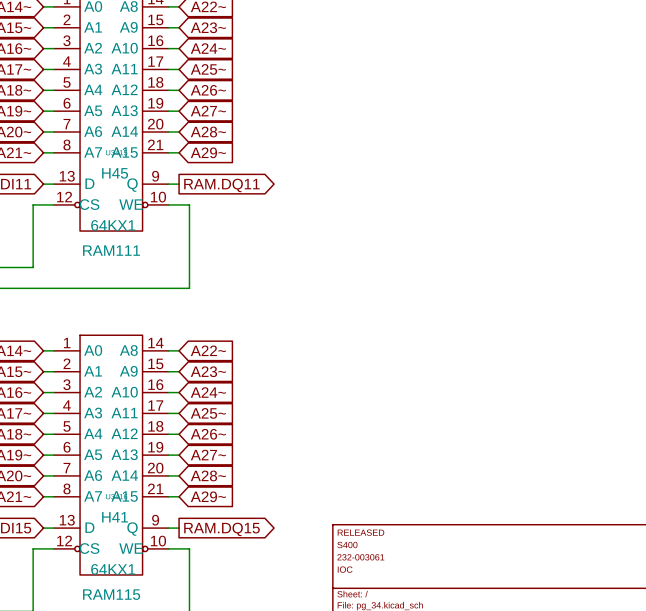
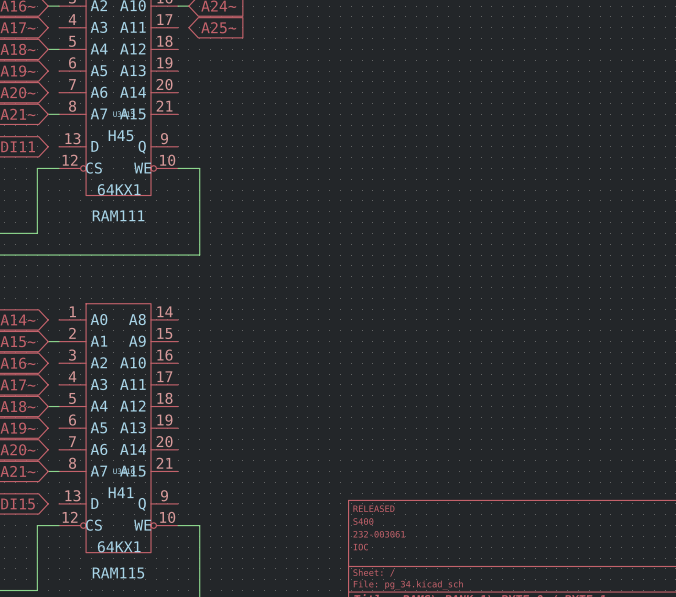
wire: (43, 69) (53, 69) -> none
wire: (168, 69) (179, 69) -> none
wire: (168, 90) (179, 90) -> none
global label: A26~ (208, 90) -> none
wire: (43, 111) (53, 111) -> none
wire: (168, 111) (179, 111) -> none
global label: A27~ (208, 111) -> none
wire: (43, 132) (53, 132) -> none
wire: (168, 132) (179, 132) -> none
global label: A28~ (208, 132) -> none
wire: (168, 152) (179, 152) -> none
global label: A29~ (208, 152) -> none
wire: (43, 184) (53, 184) -> none
wire: (168, 184) (179, 184) -> none
global label: RAM.DQ11 (221, 185) -> none
wire: (43, 350) (53, 350) -> none
wire: (168, 350) (179, 350) -> none
global label: A22~ (208, 350) -> none
wire: (168, 371) (179, 371) -> none
global label: A23~ (208, 371) -> none
wire: (43, 392) (53, 392) -> none
wire: (168, 392) (179, 392) -> none
global label: A24~ (208, 392) -> none
wire: (43, 413) (53, 413) -> none
wire: (168, 413) (179, 413) -> none
global label: A25~ (208, 413) -> none
wire: (168, 434) (179, 434) -> none
global label: A26~ (208, 434) -> none
wire: (43, 455) (53, 455) -> none
wire: (168, 455) (179, 455) -> none
global label: A27~ (208, 455) -> none
wire: (43, 475) (53, 475) -> none
wire: (168, 475) (179, 475) -> none
global label: A28~ (208, 475) -> none
wire: (168, 496) (179, 496) -> none
global label: A29~ (208, 496) -> none
wire: (43, 528) (53, 528) -> none
wire: (168, 528) (179, 528) -> none
global label: RAM.DQ15 (221, 529) -> none

